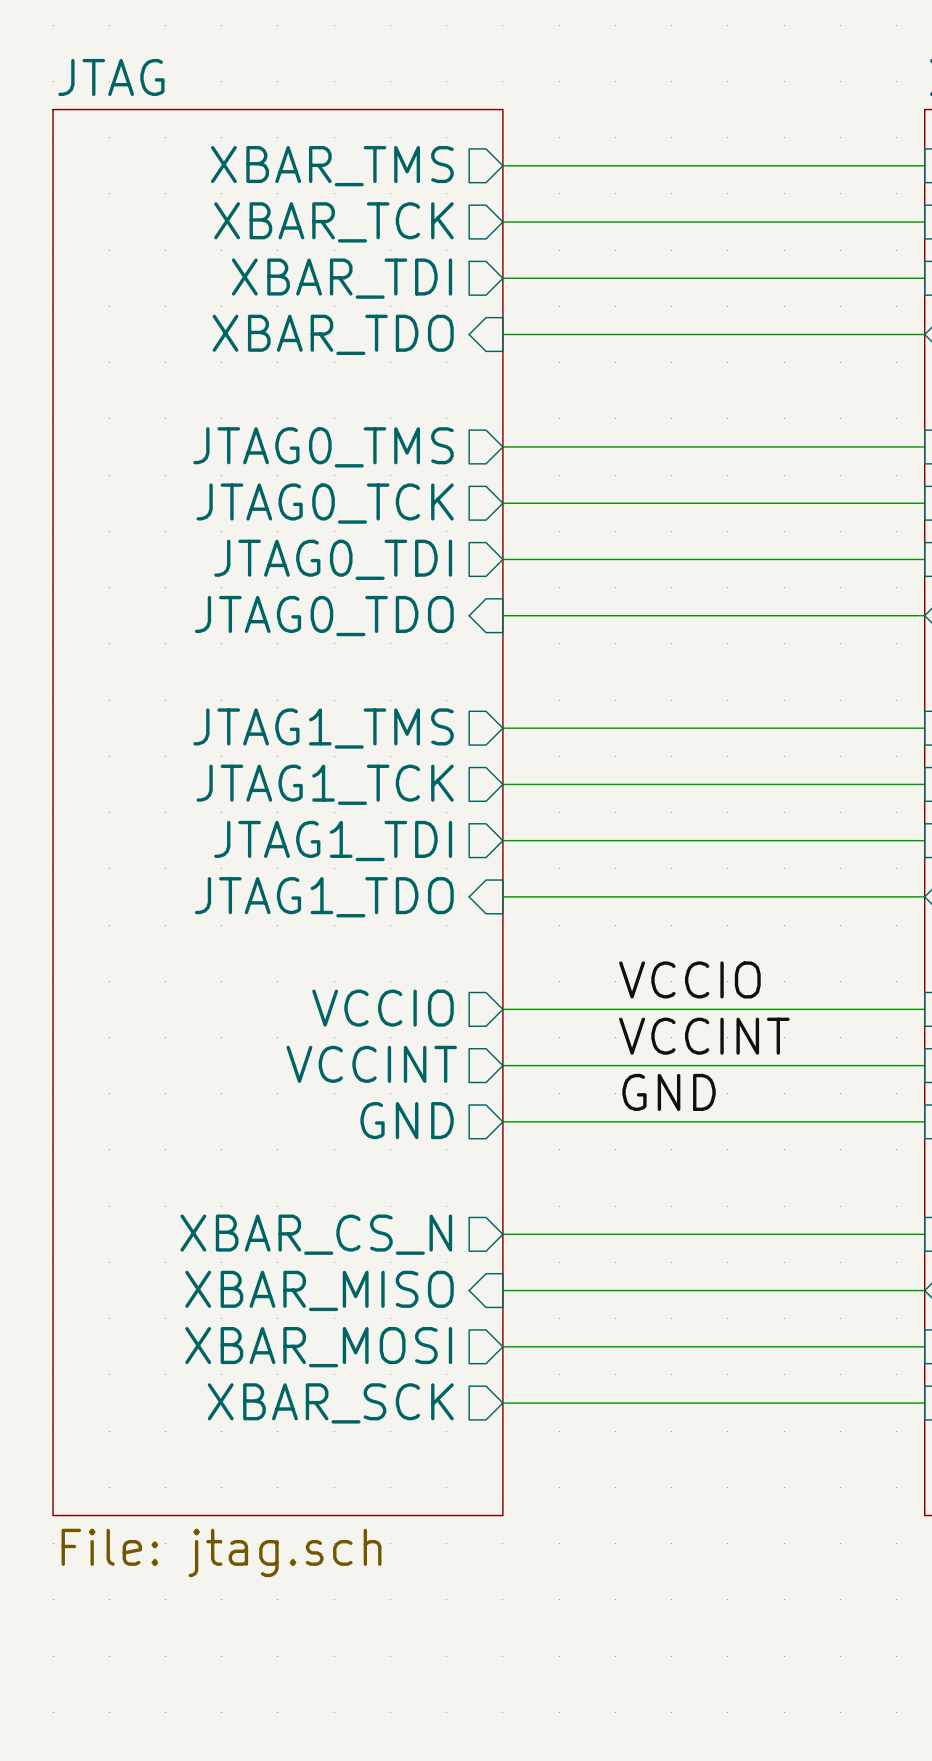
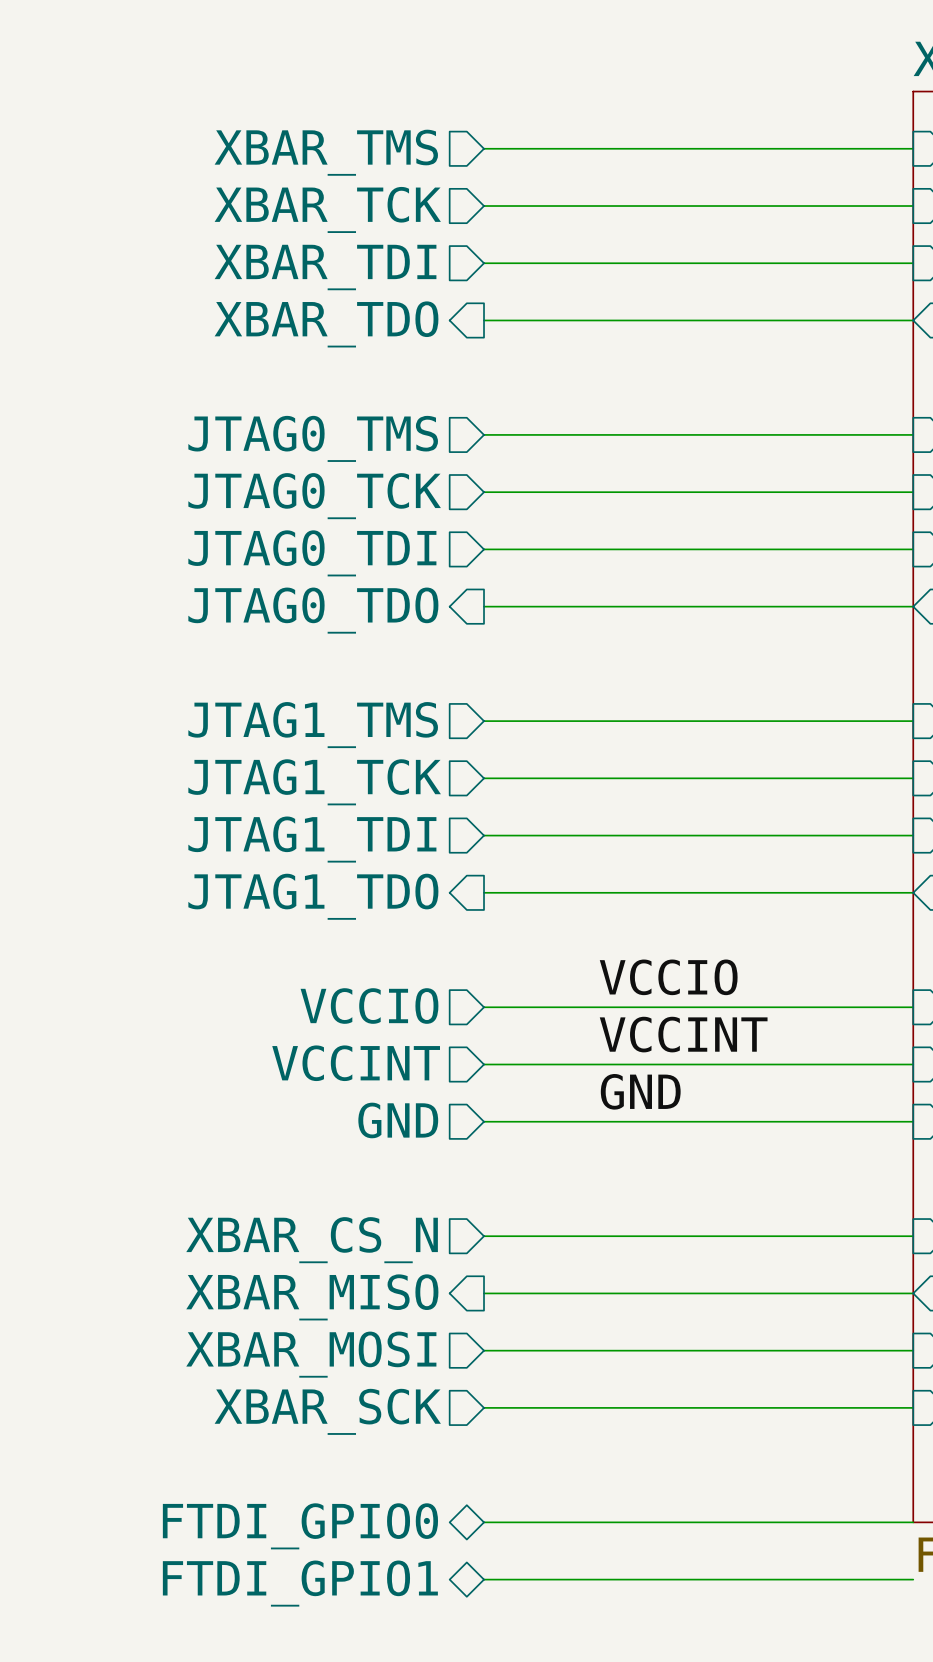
sheet JTAG: File: jtag.sch (277, 812) -> none
sheet pin: none -> FTDI_GPIO0 (300, 1526)
wire: none -> (484, 1522) (913, 1522)
wire: none -> (484, 1579) (913, 1579)
sheet pin: none -> FTDI_GPIO1 (300, 1583)

